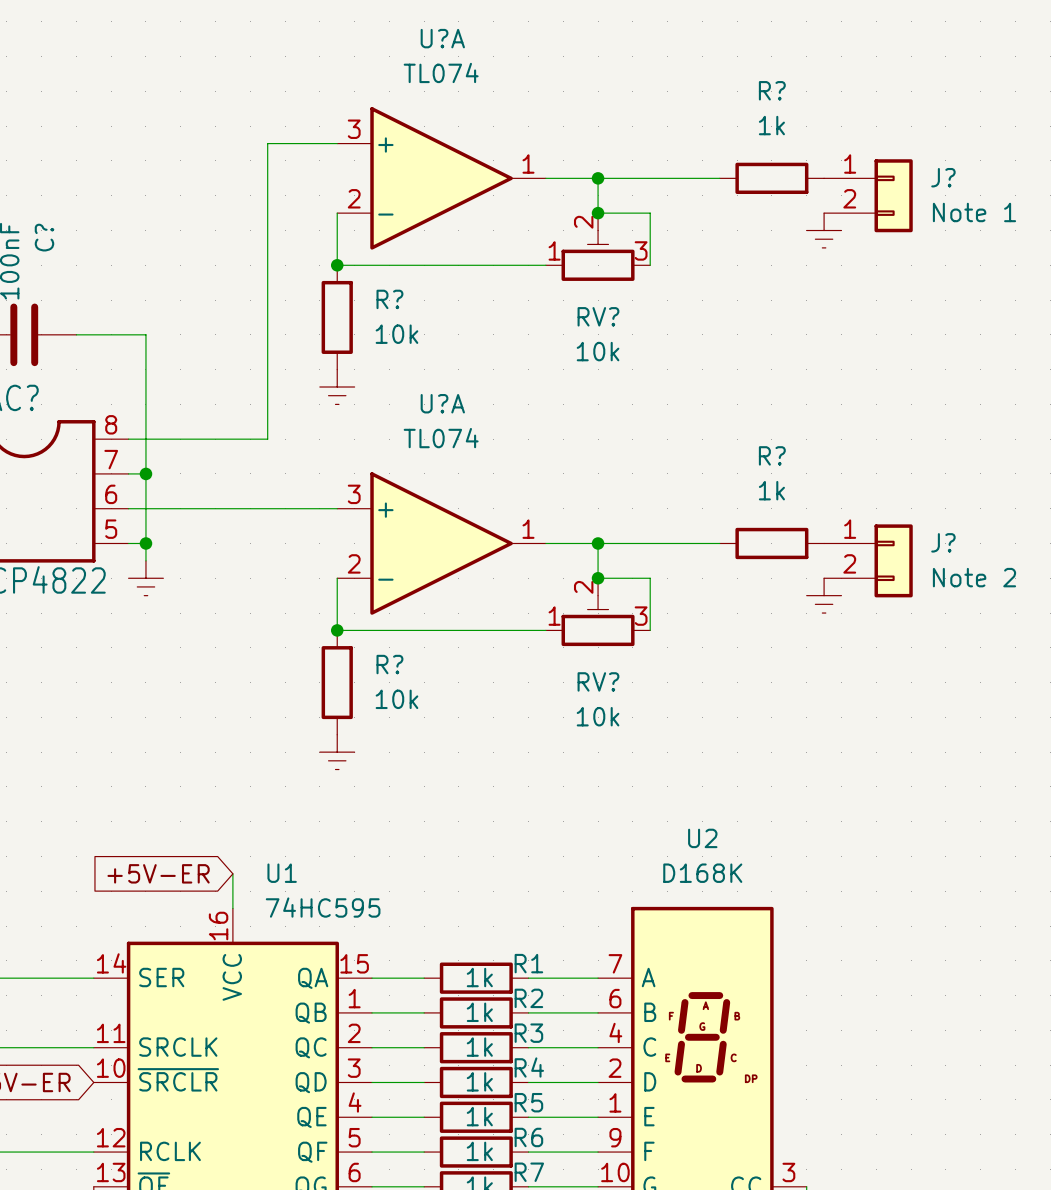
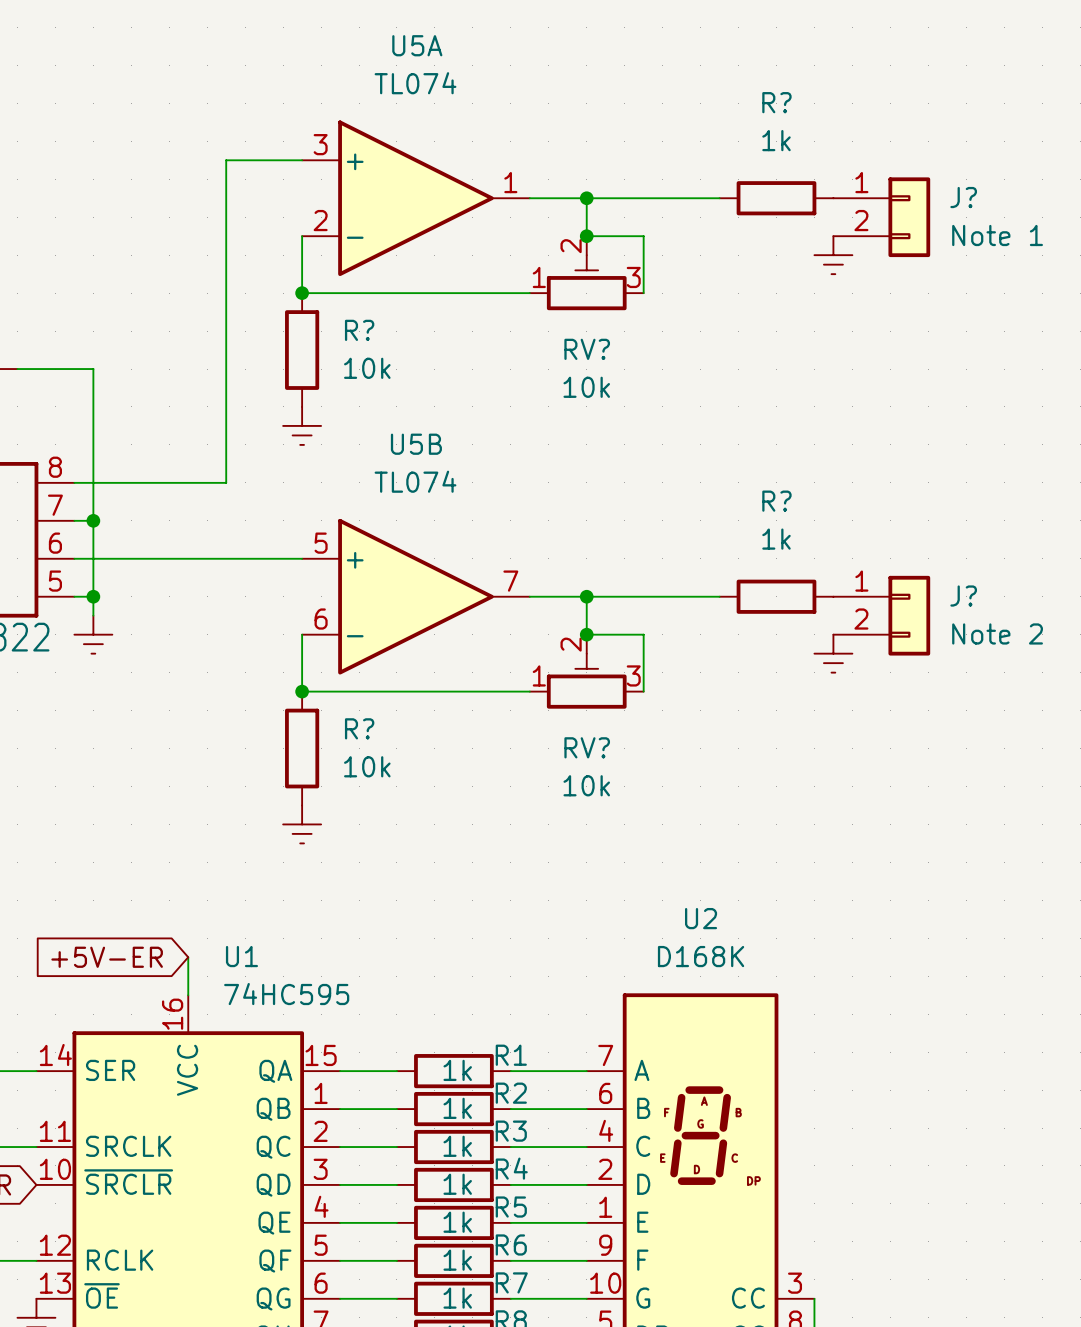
U?A name: U?A (442, 38) -> U5A (417, 45)
U?A name: U?A (442, 403) -> U5B (416, 444)
U?A pin number: 3 (354, 494) -> 5 (321, 543)
U?A pin number: 1 (528, 529) -> 7 (510, 581)
U?A pin number: 2 (354, 563) -> 6 (321, 619)

